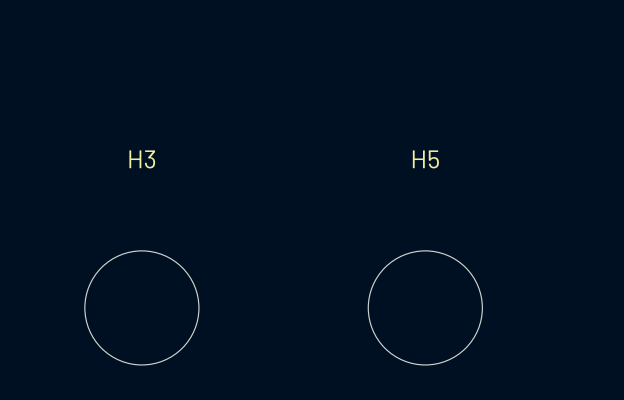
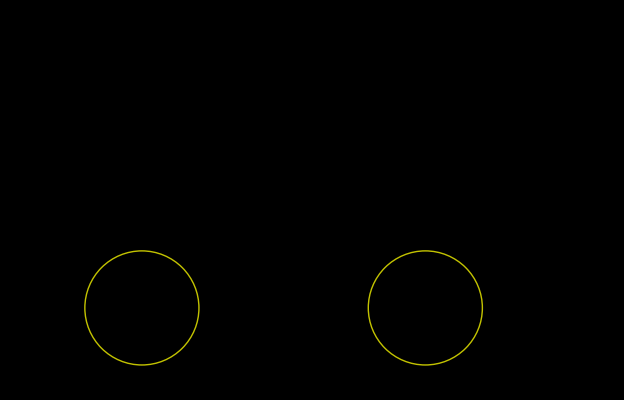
H3 name: H3 (142, 159) -> none
H5 name: H5 (425, 159) -> none

